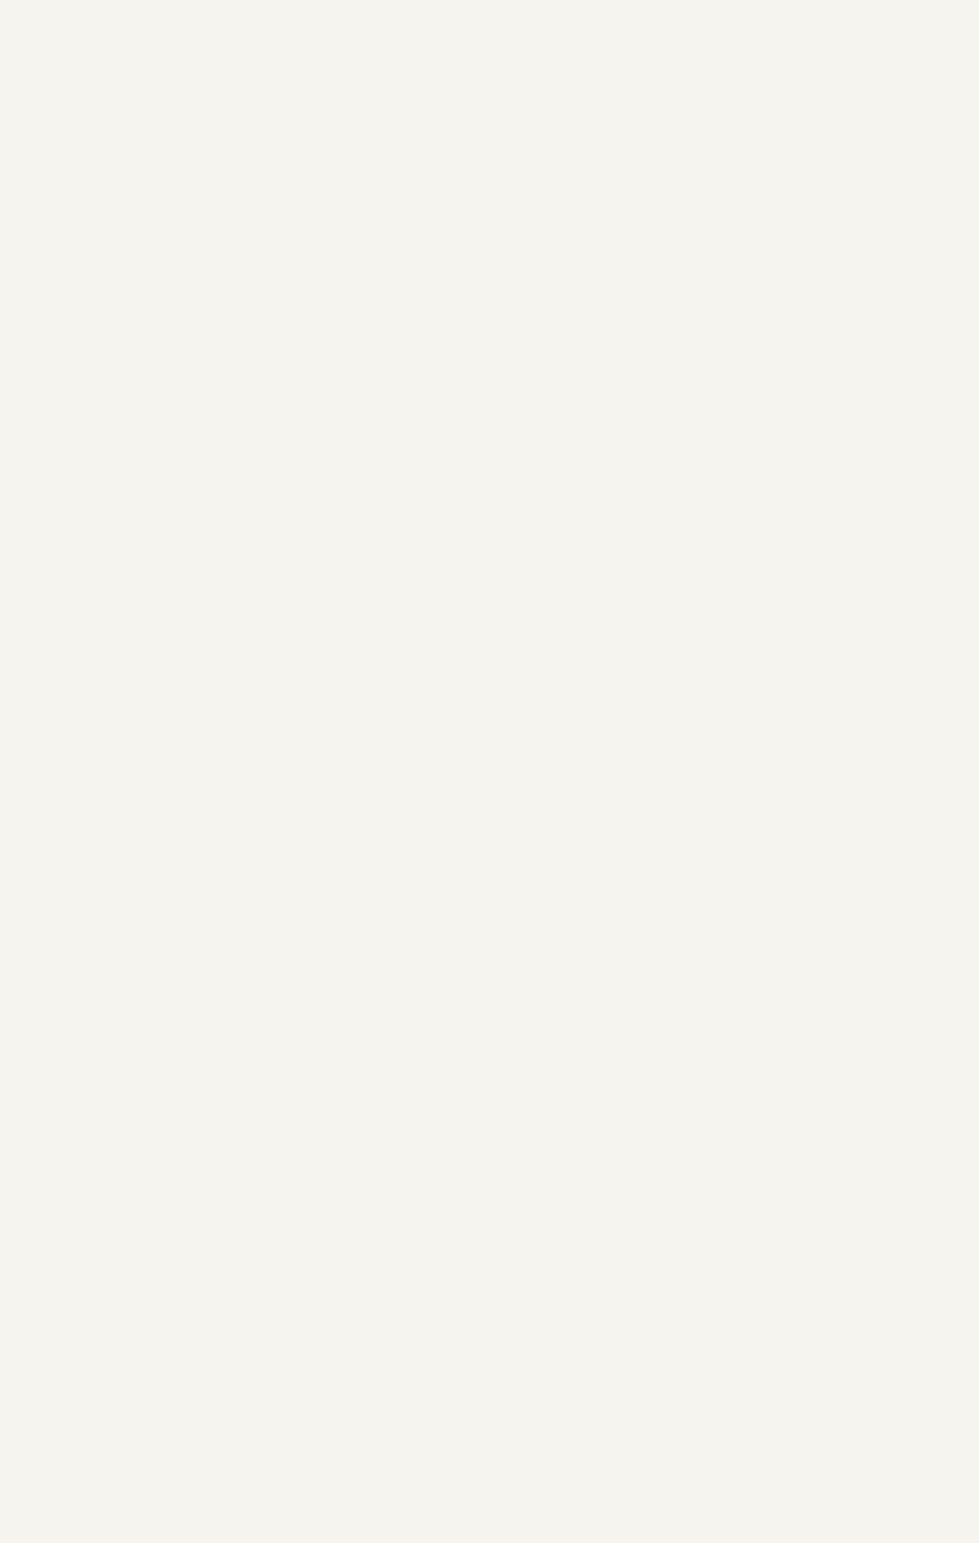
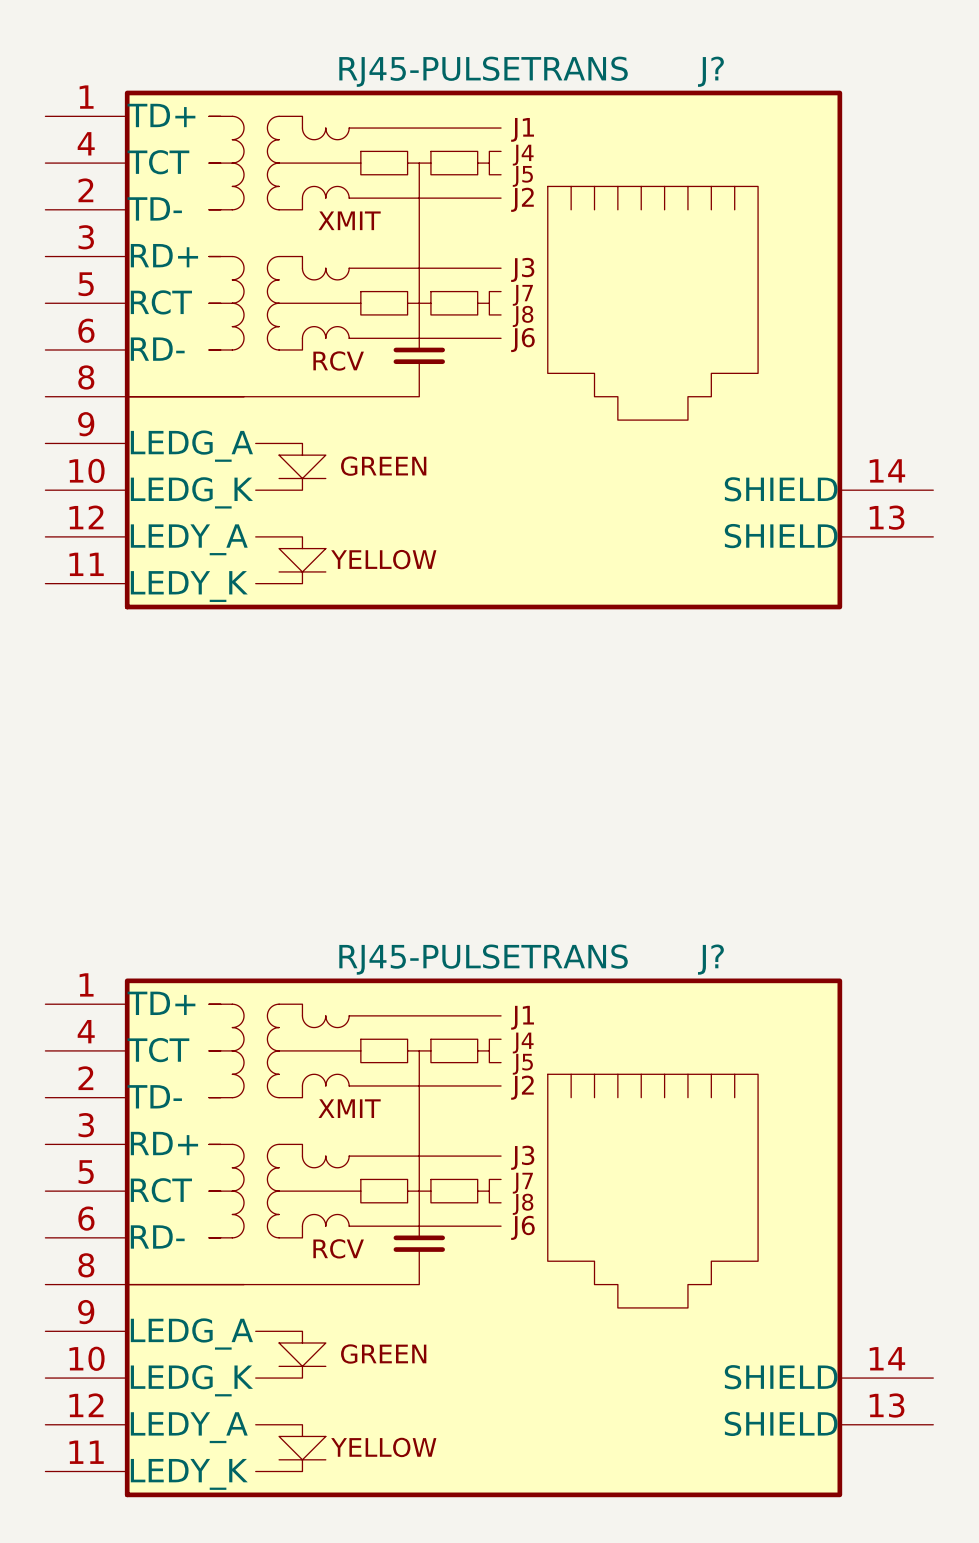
J?: none -> RJ45-PULSETRANS (489, 349)
J?: none -> RJ45-PULSETRANS (489, 1237)

